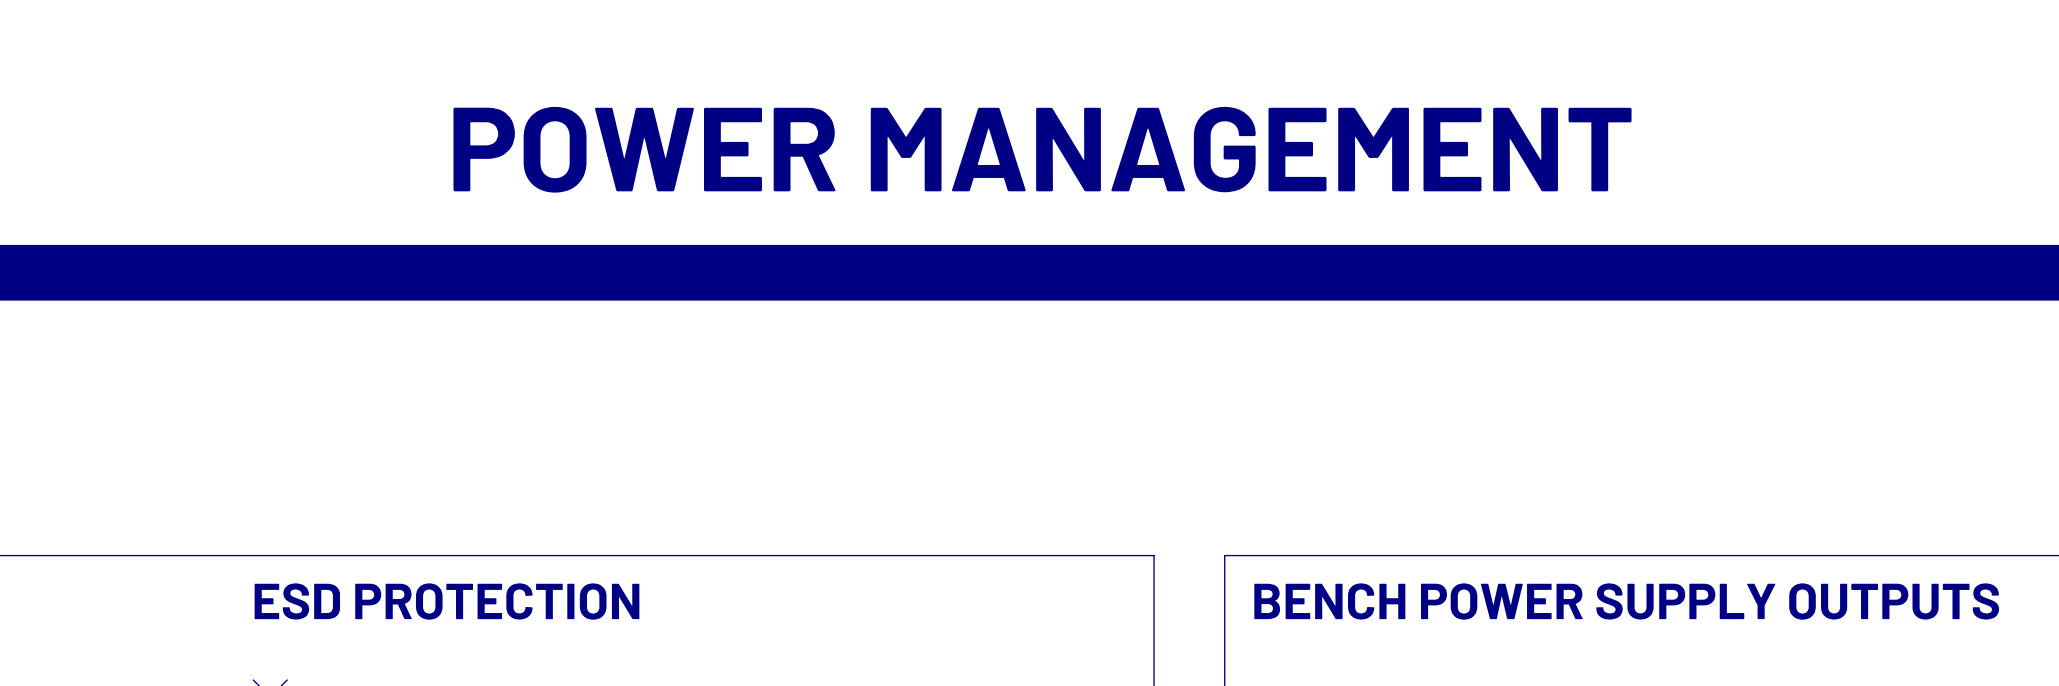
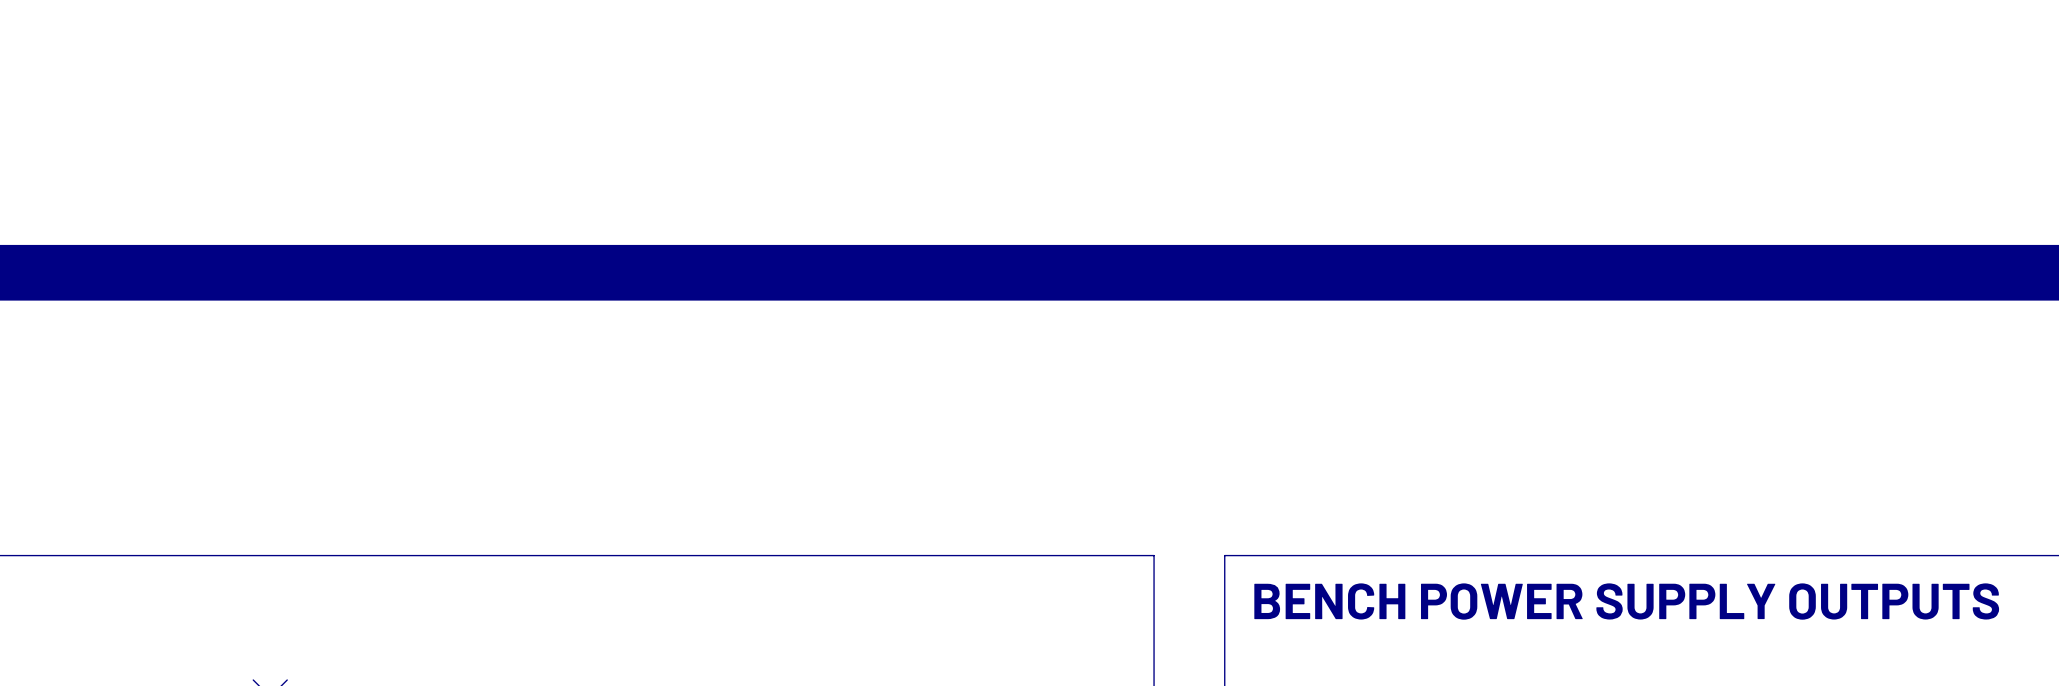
text: POWER MANAGEMENT (1042, 149) -> none
text: ESD PROTECTION (447, 601) -> none

